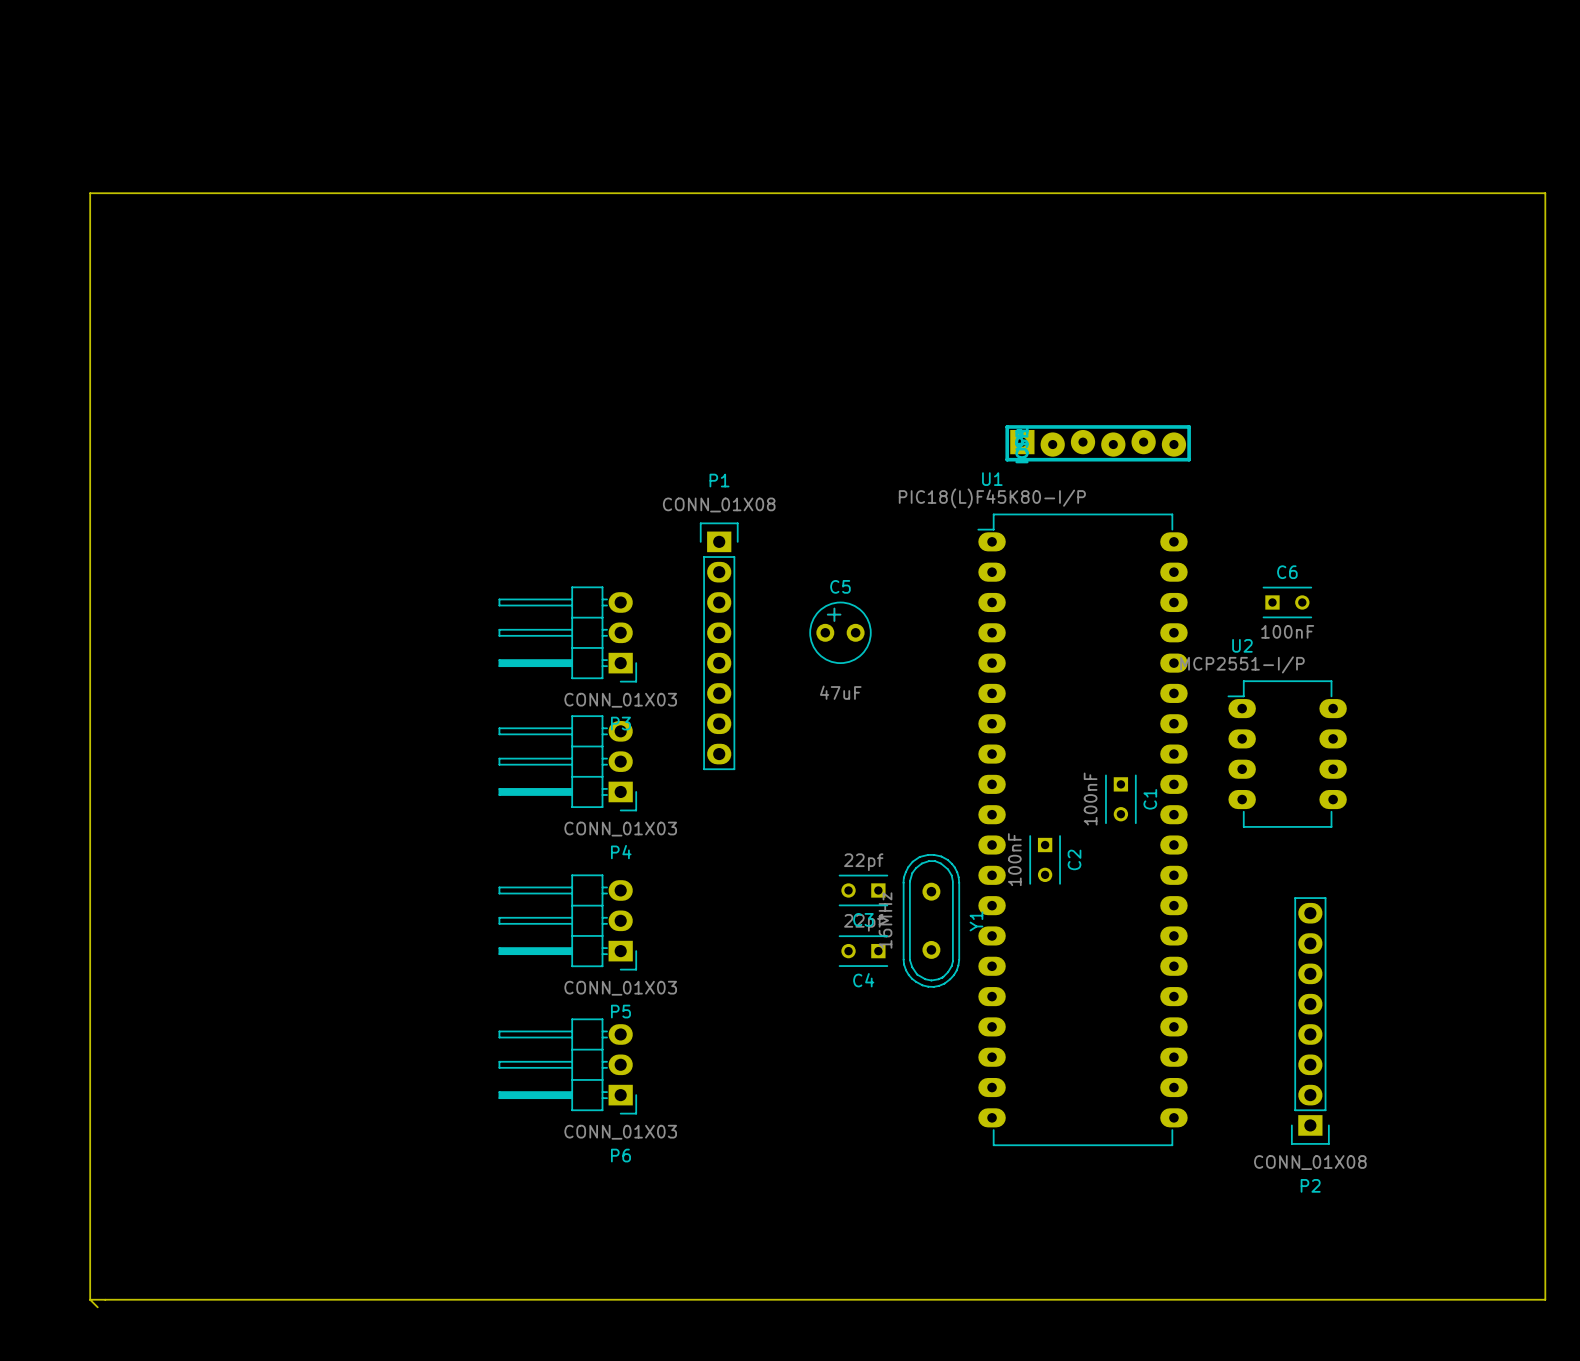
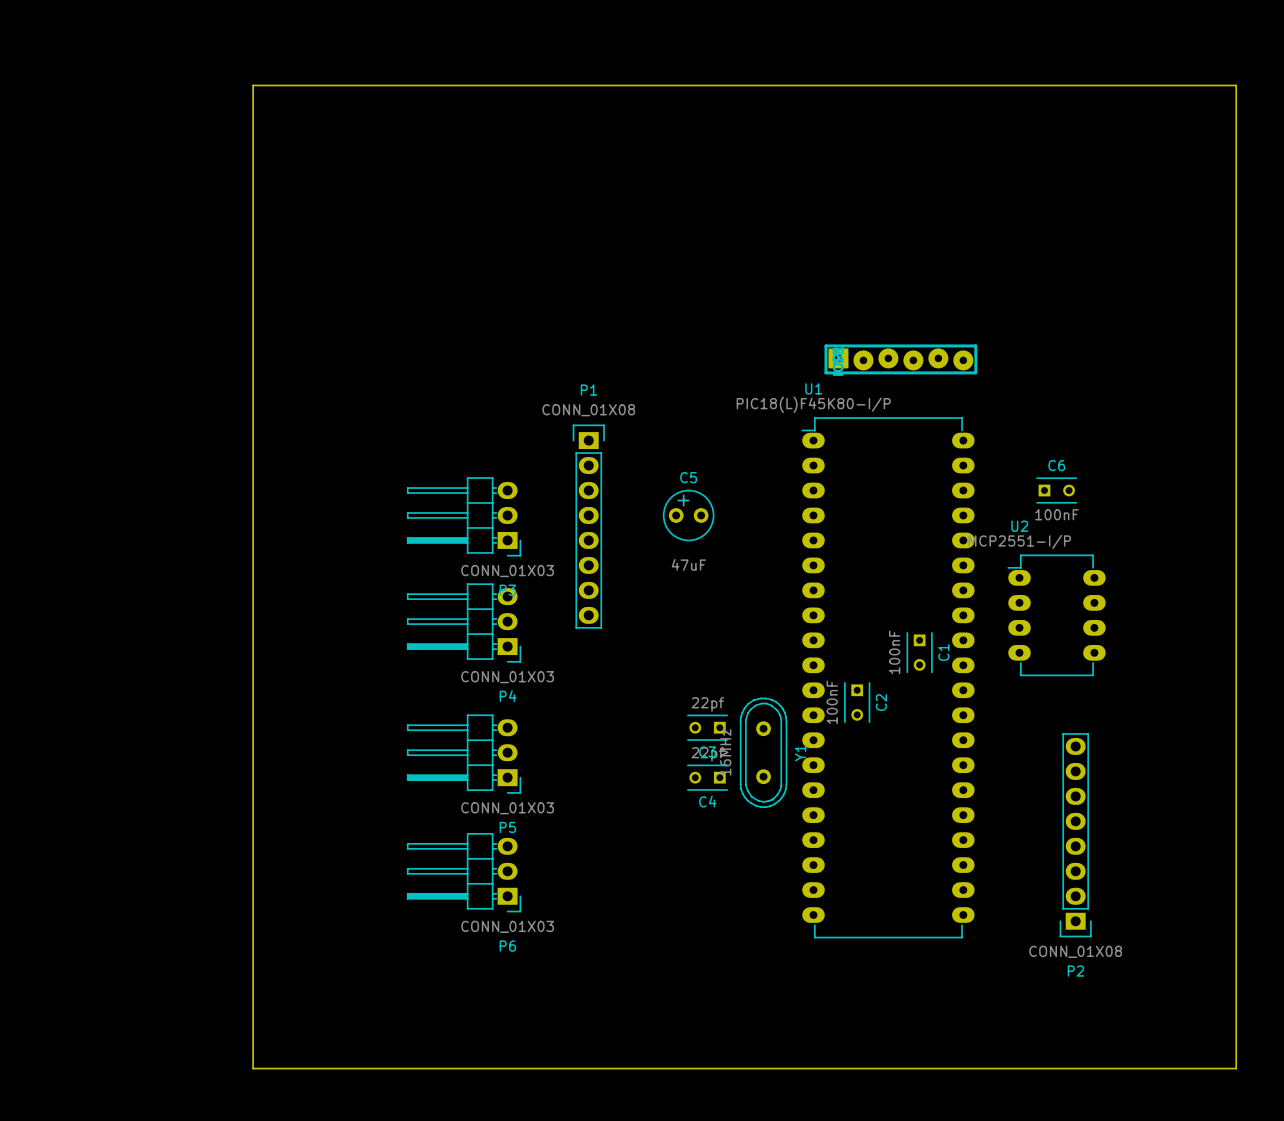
board edge: (90, 1299) (1545, 1299) (1545, 193) (90, 193) (90, 1299) -> (253, 85) (253, 1068) (1236, 1068) (1236, 85) (253, 85)
board edge: (90, 1299) (97, 1307) -> none

